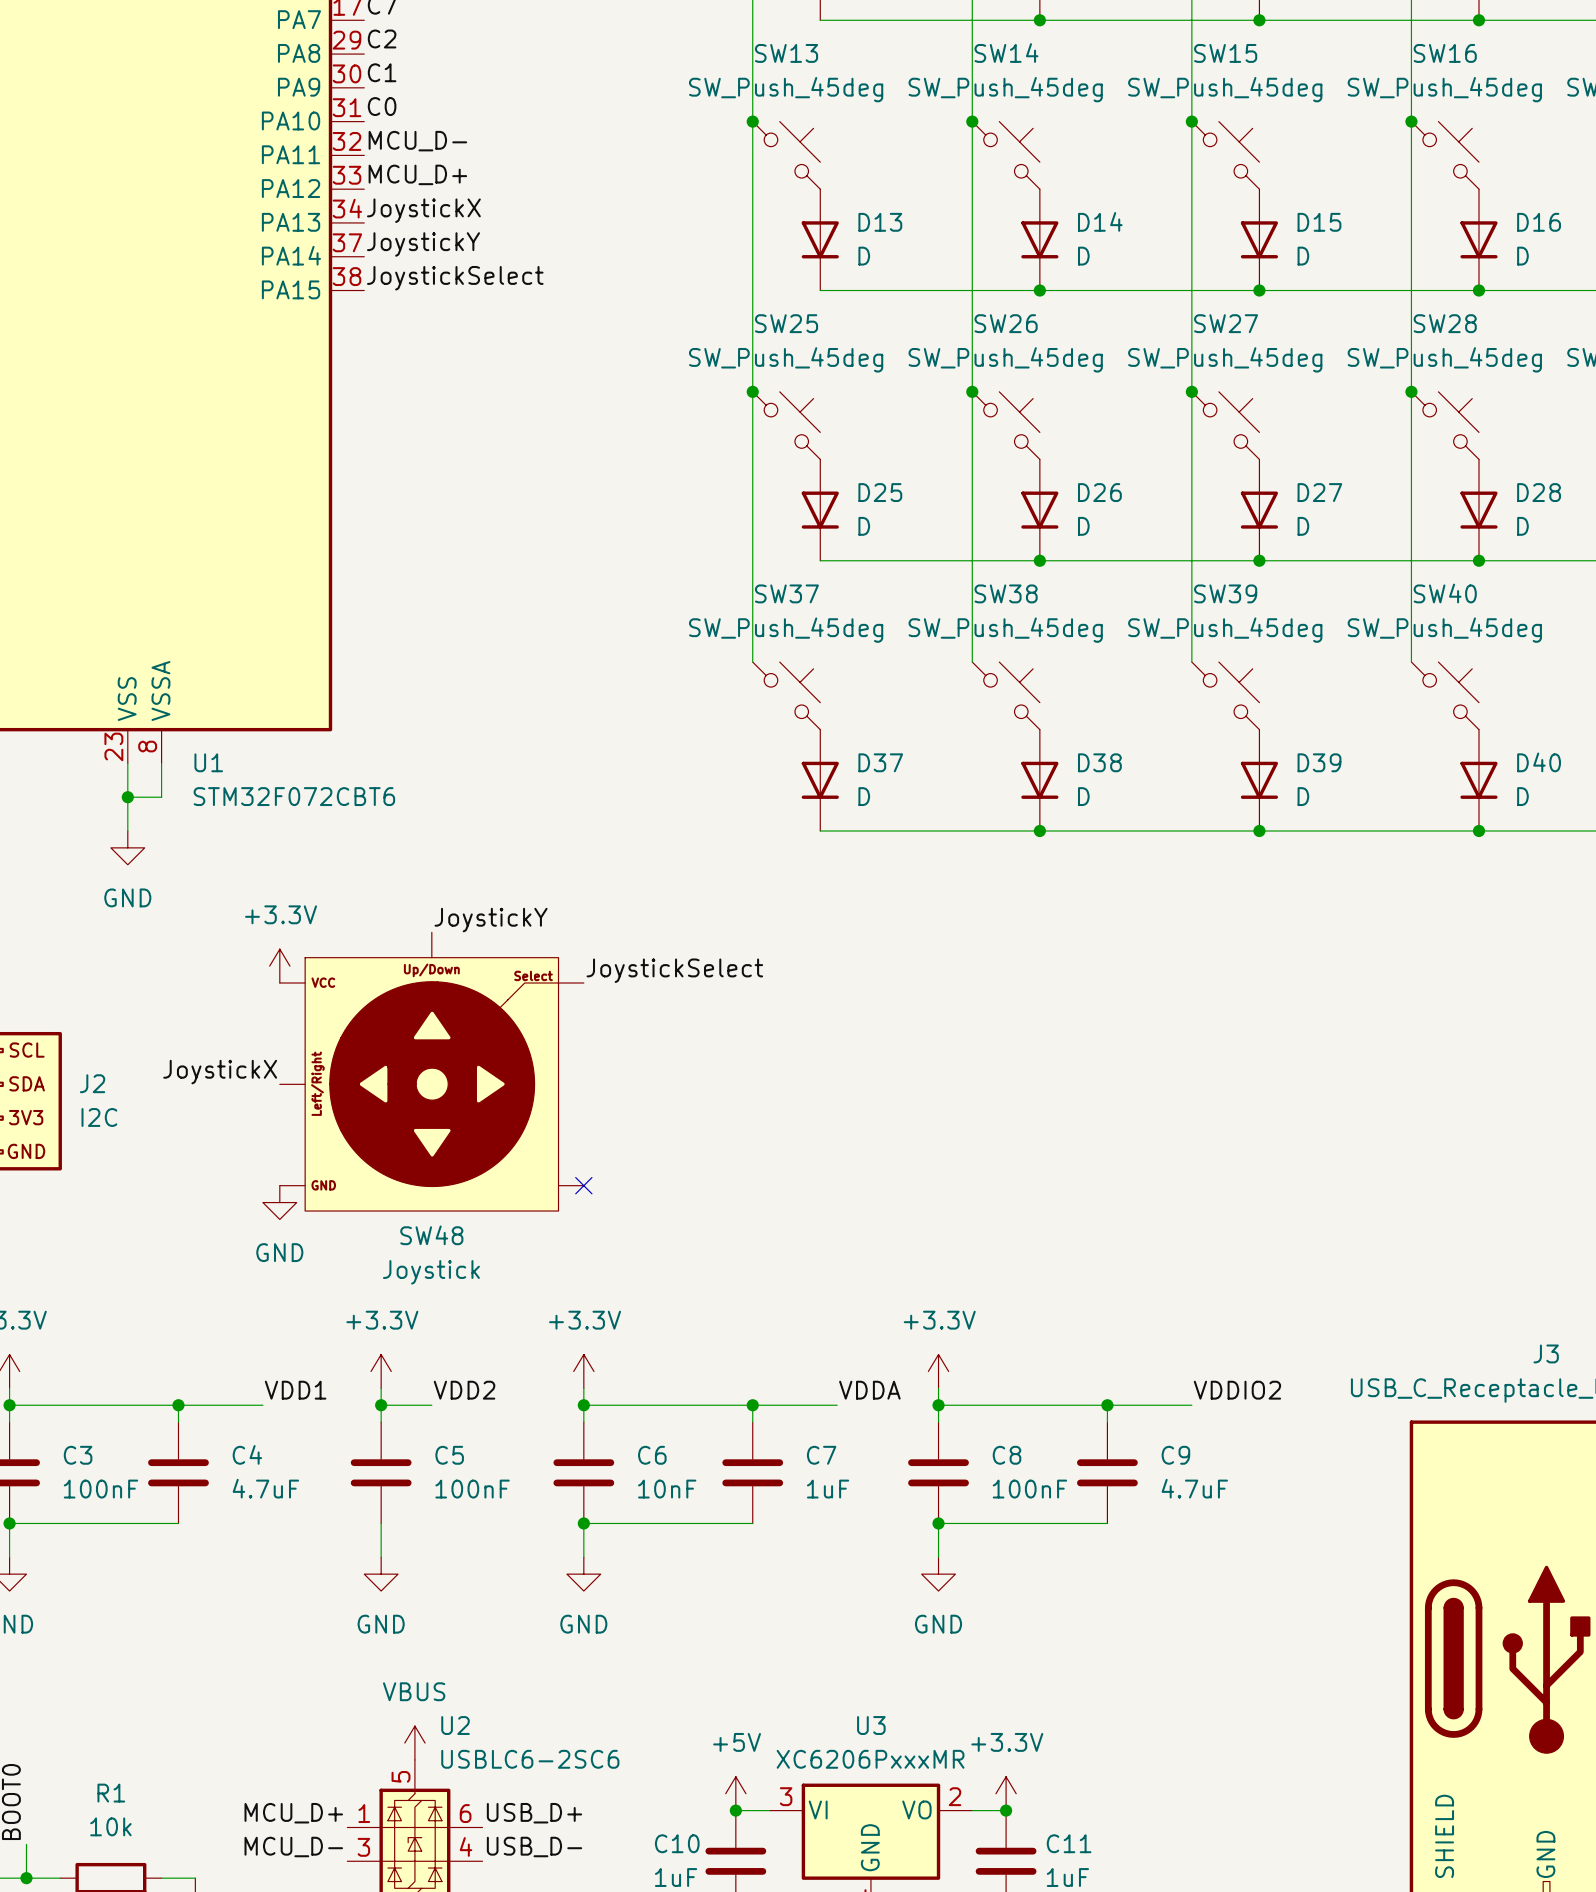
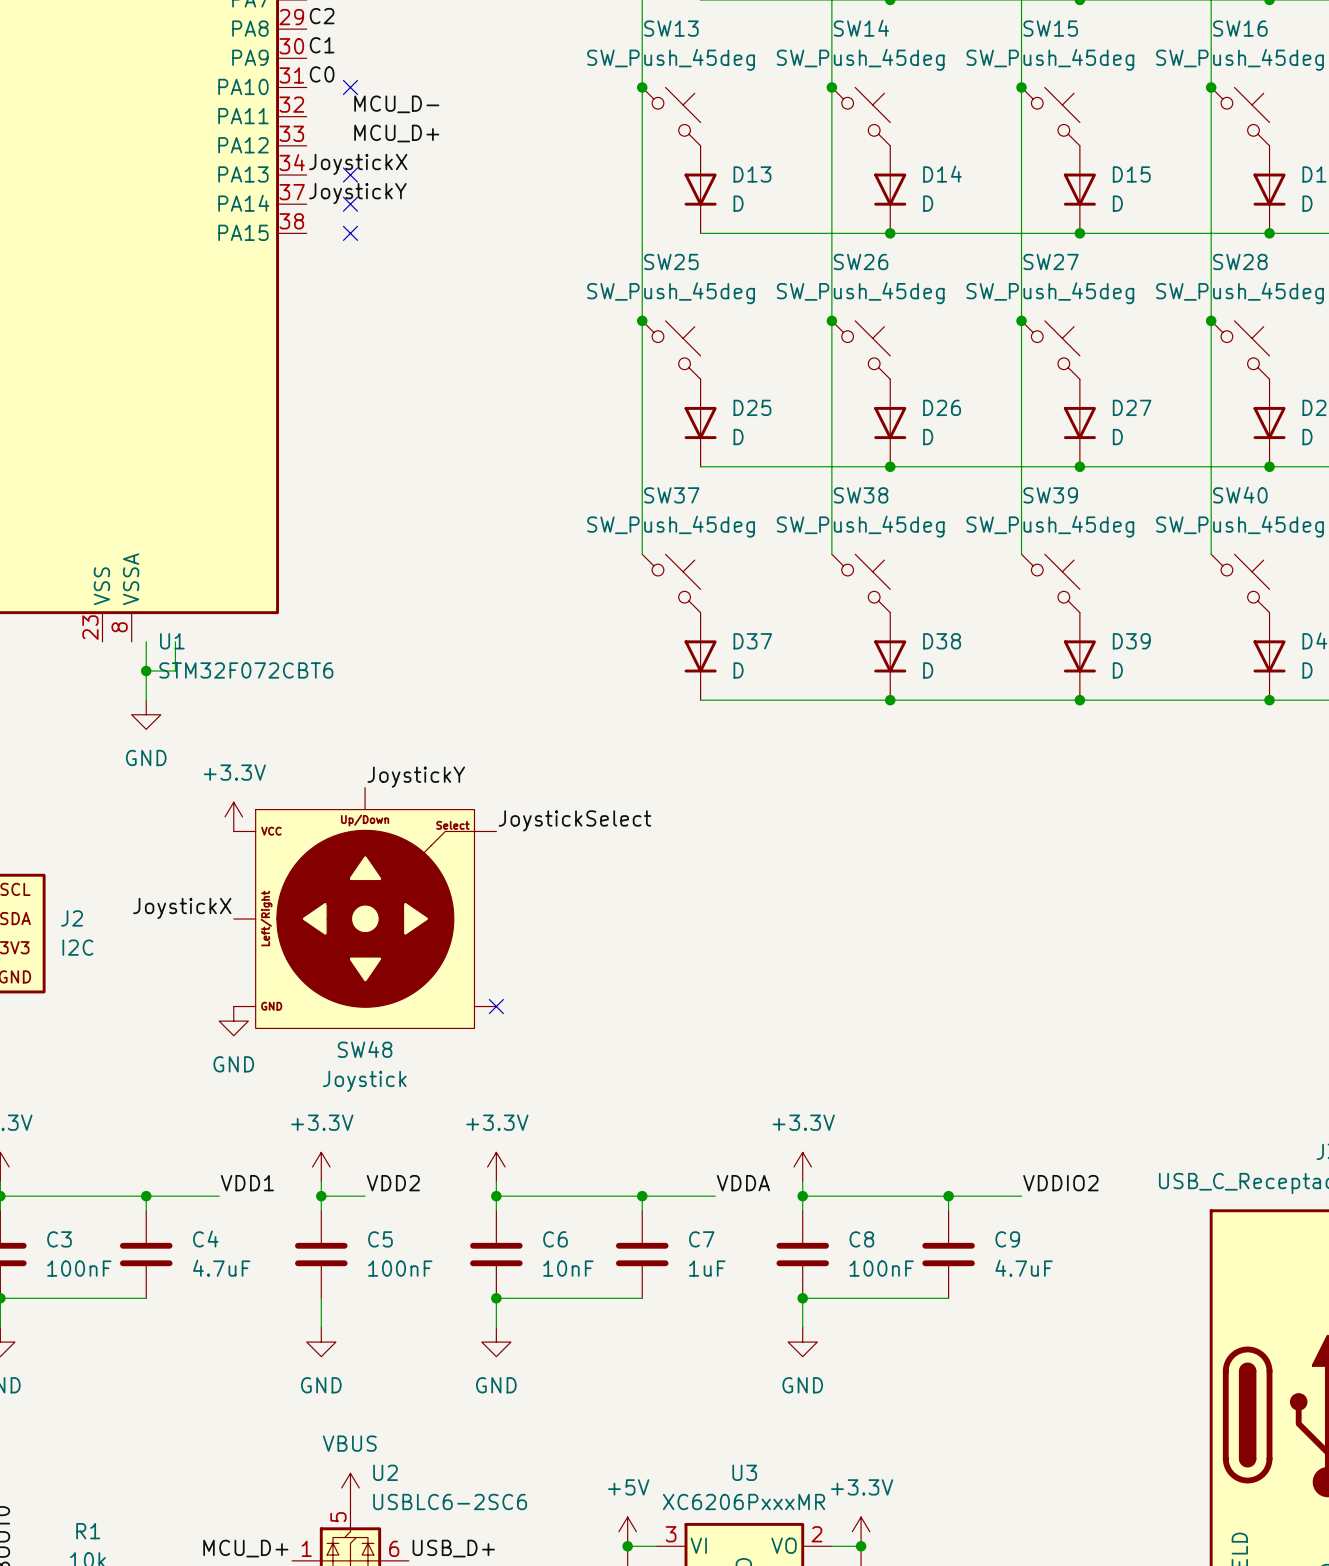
no-connect mark: none -> (350, 87)
label position: MCU_D- (417, 141) -> MCU_D- (396, 104)
label position: MCU_D+ (417, 174) -> MCU_D+ (396, 133)
no-connect mark: none -> (350, 175)
no-connect mark: none -> (350, 204)
label: JoystickSelect (455, 278) -> none
no-connect mark: none -> (350, 233)
wire: (127, 763) (127, 830) -> (146, 641) (146, 700)
wire: (161, 763) (161, 797) (127, 797) -> (175, 641) (175, 671) (146, 671)
junction position: (127, 797) -> (146, 671)
power symbol position: GND (127, 847) -> GND (146, 714)

